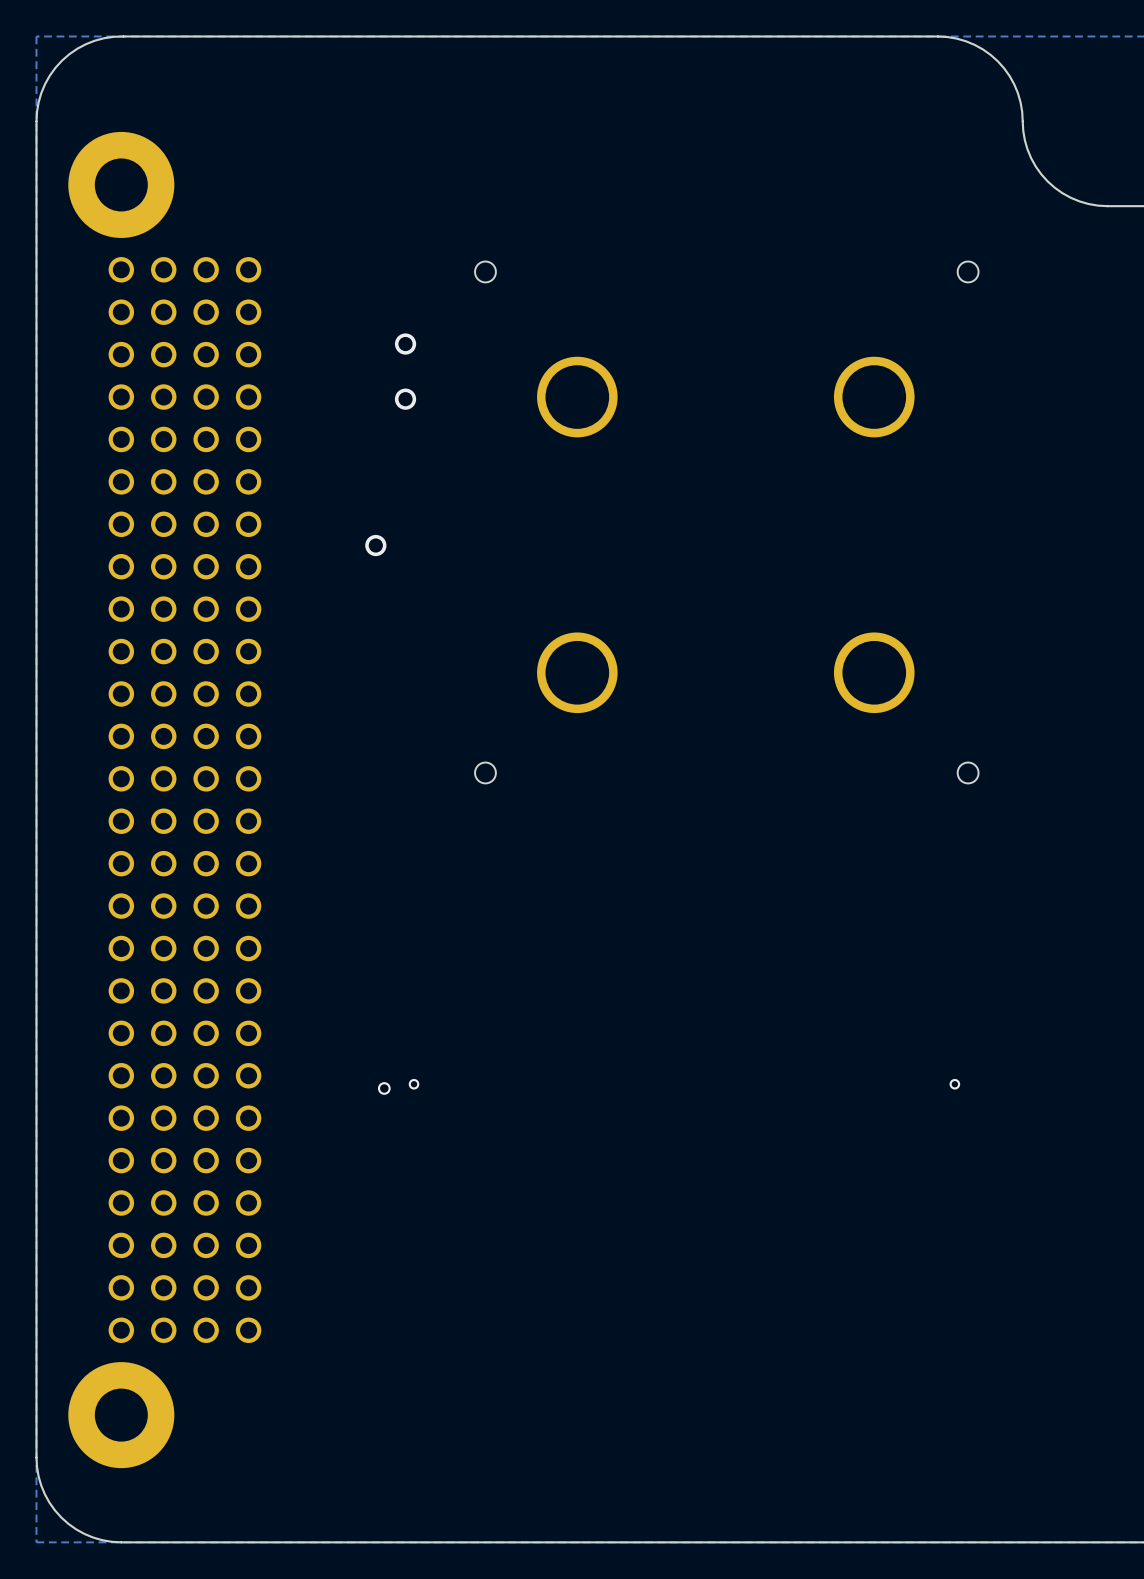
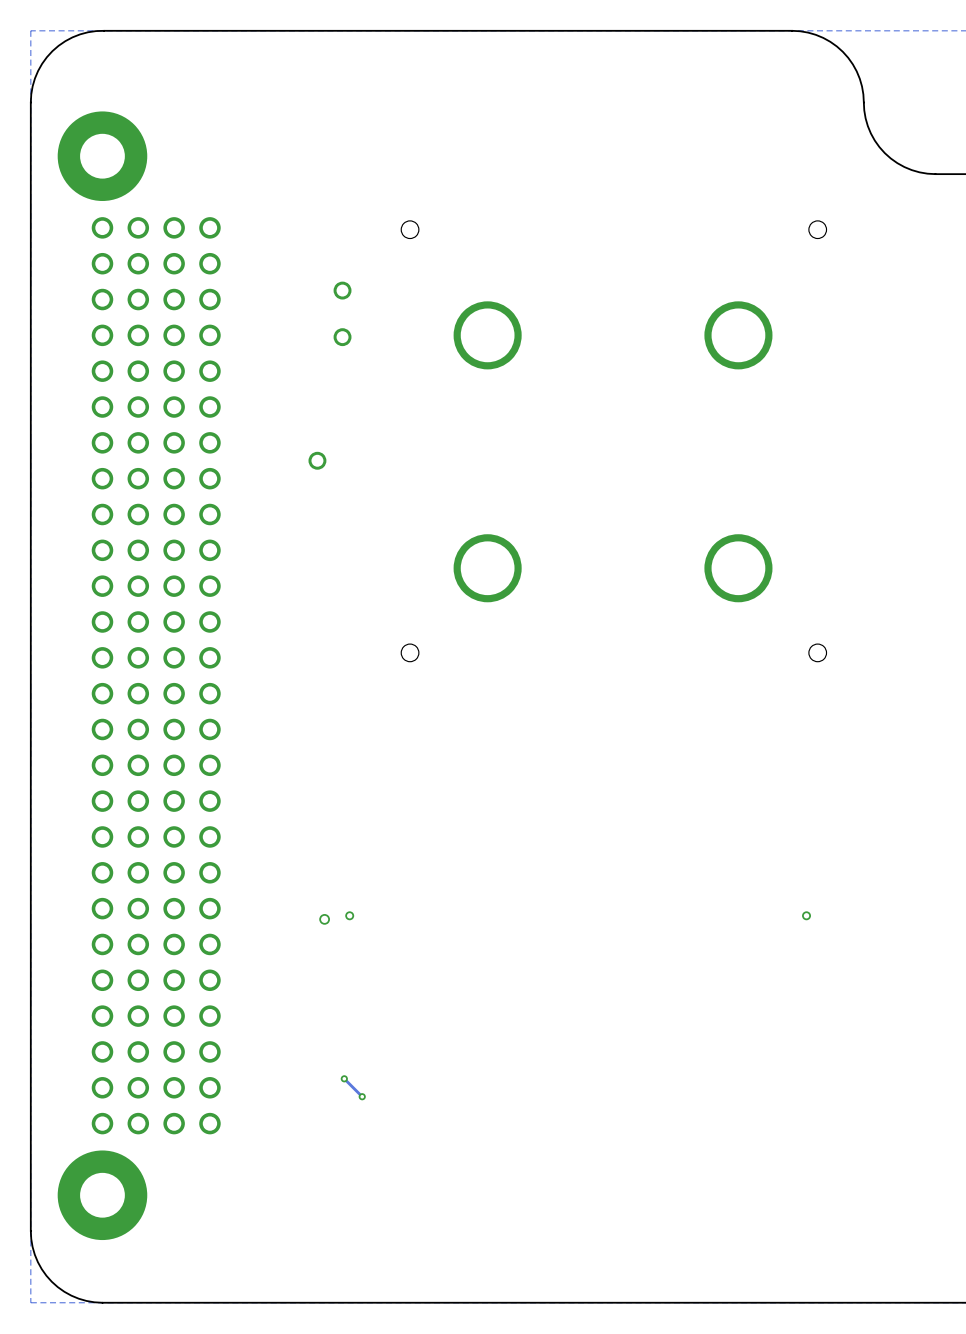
track: none -> (344, 1078) (362, 1096)
via: none -> (344, 1078)
via: none -> (362, 1096)

